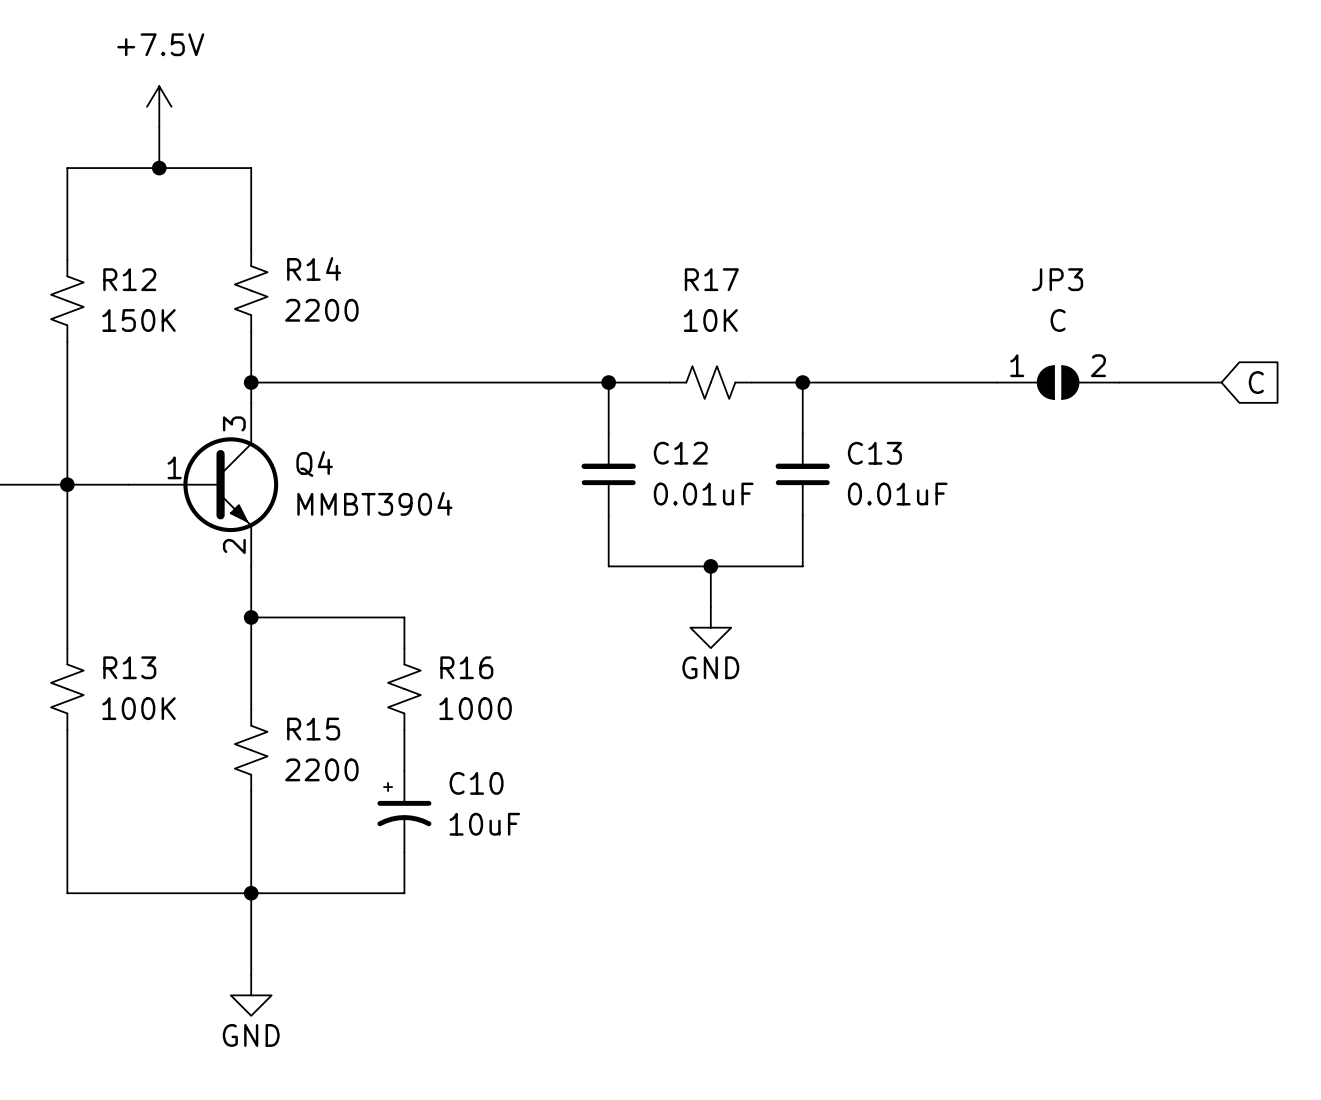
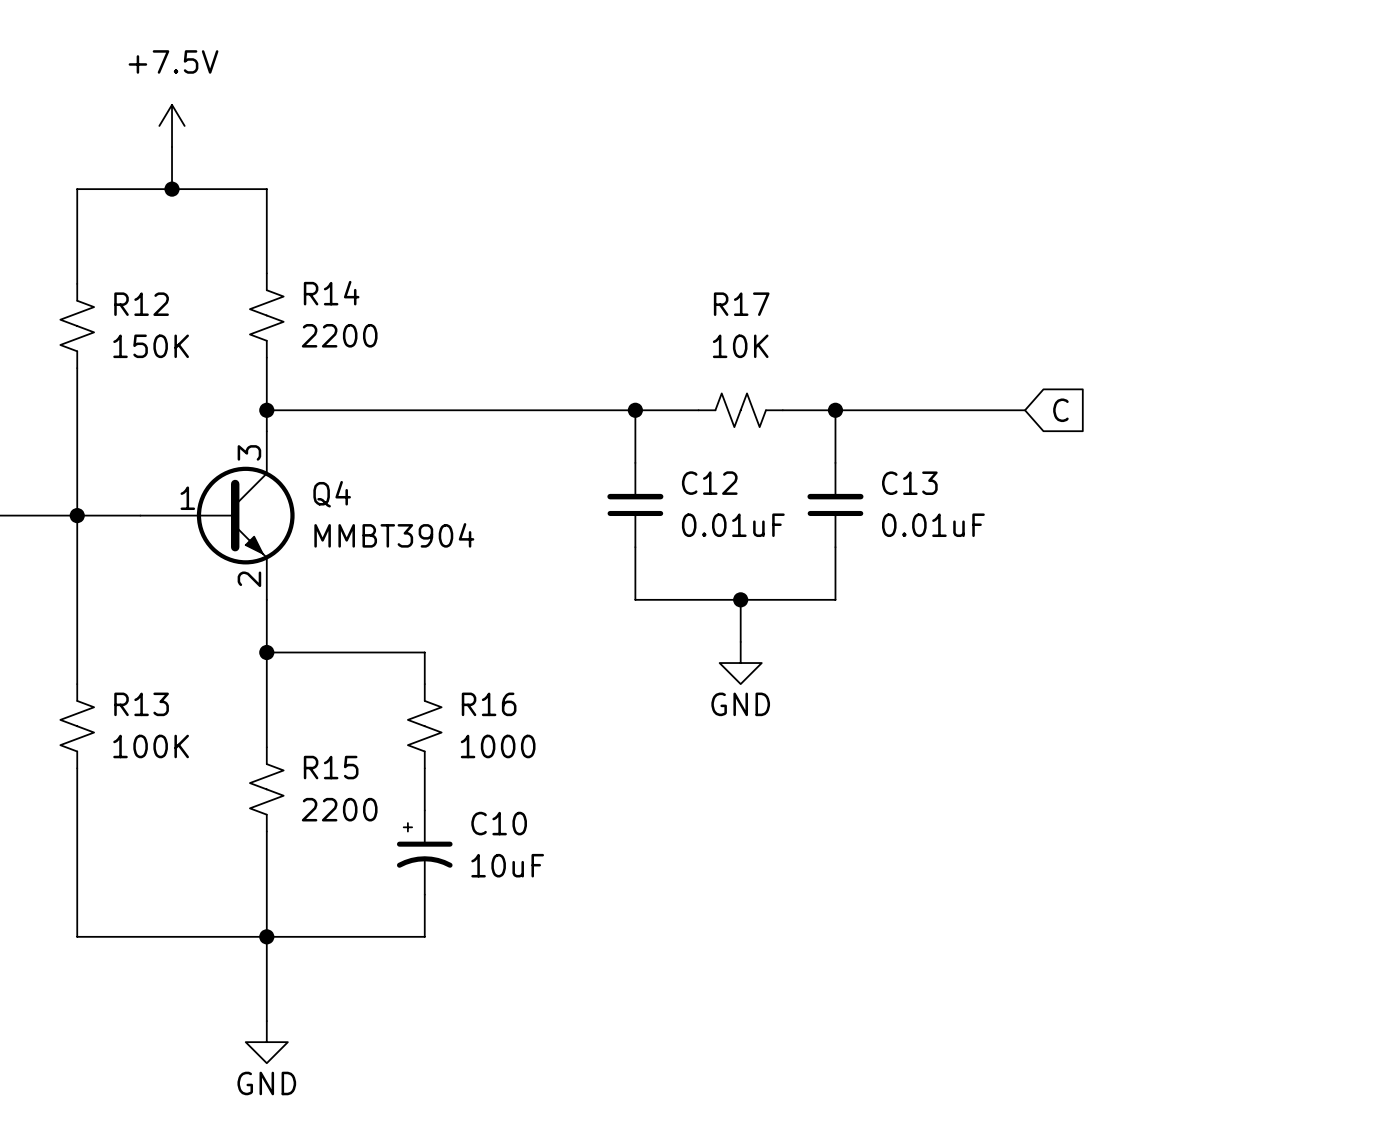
wire: (986, 382) (996, 382) -> none
JP3: C (1058, 382) -> none
wire: (1119, 382) (1221, 382) -> none
global label position: C (1256, 382) -> C (1060, 410)

